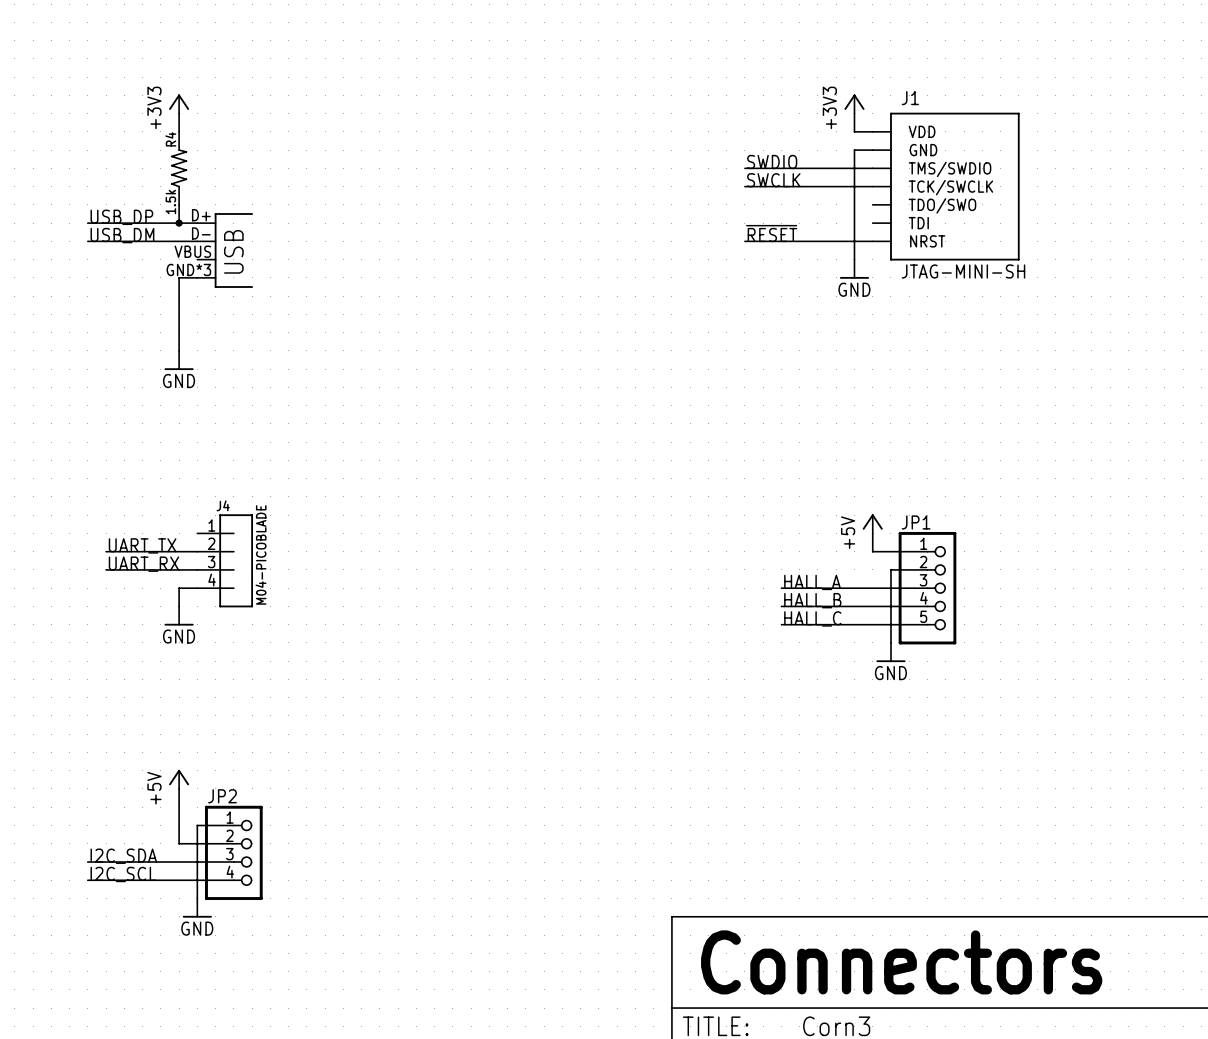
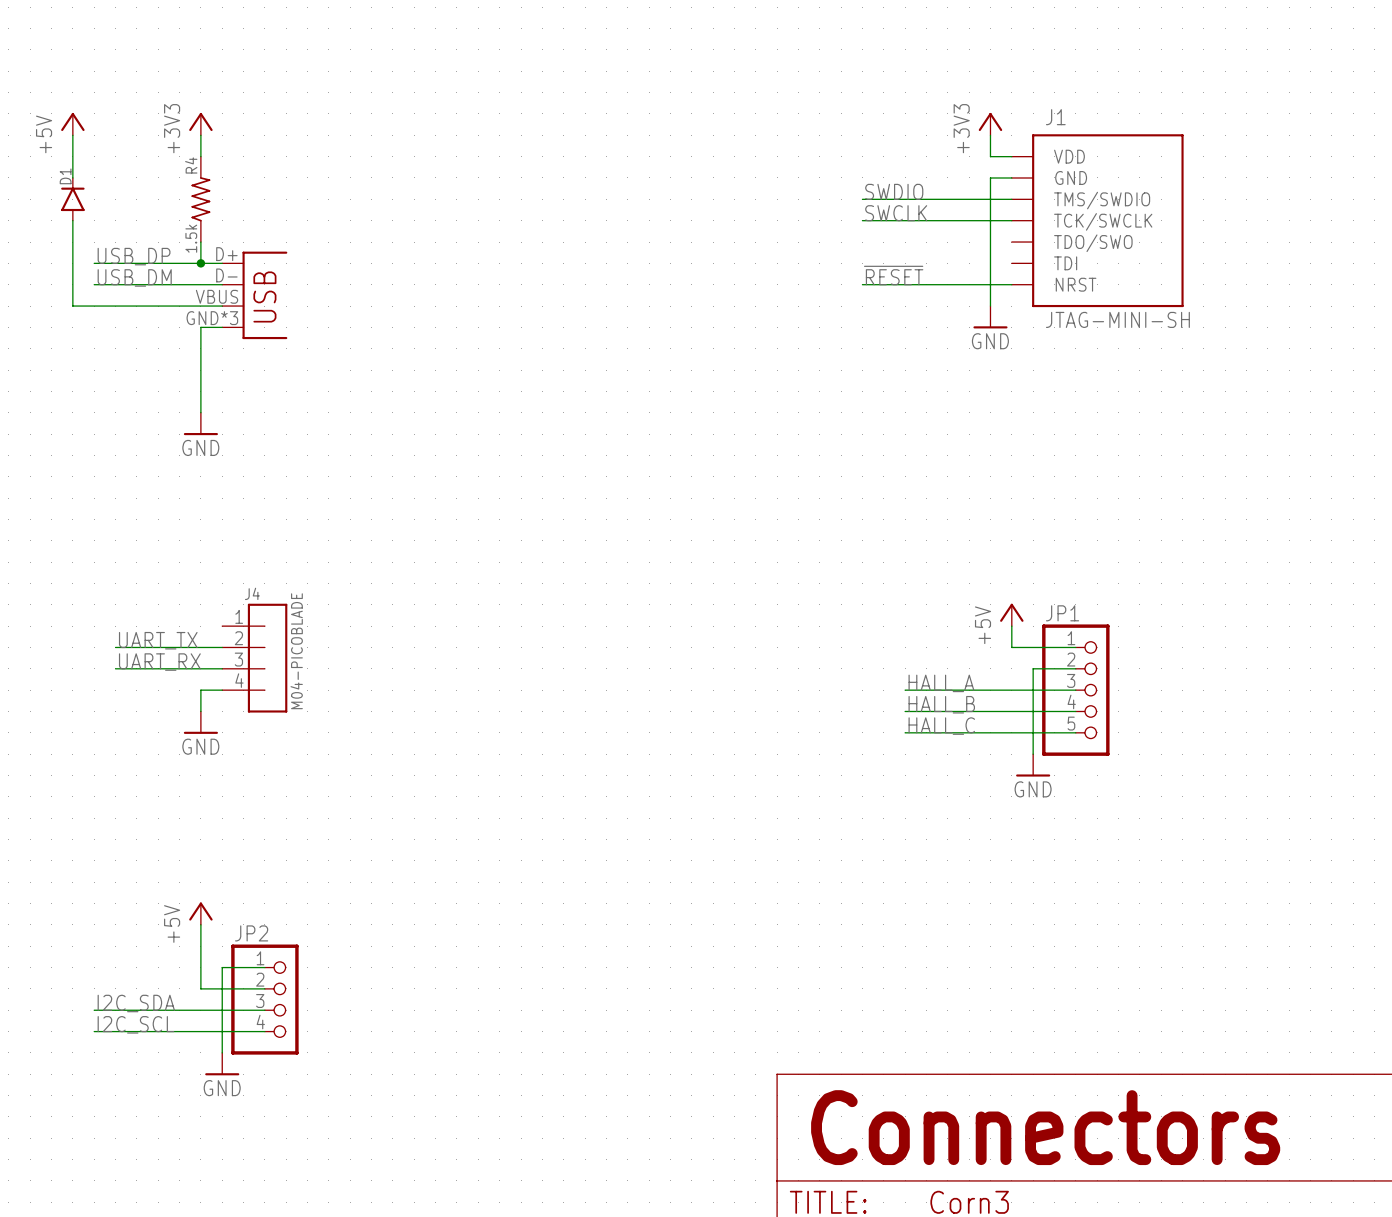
power symbol: none -> +5V (72, 124)
wire: none -> (72, 135) (72, 177)
D1: none -> (72, 199)
wire: none -> (72, 220) (72, 306) (222, 306)

